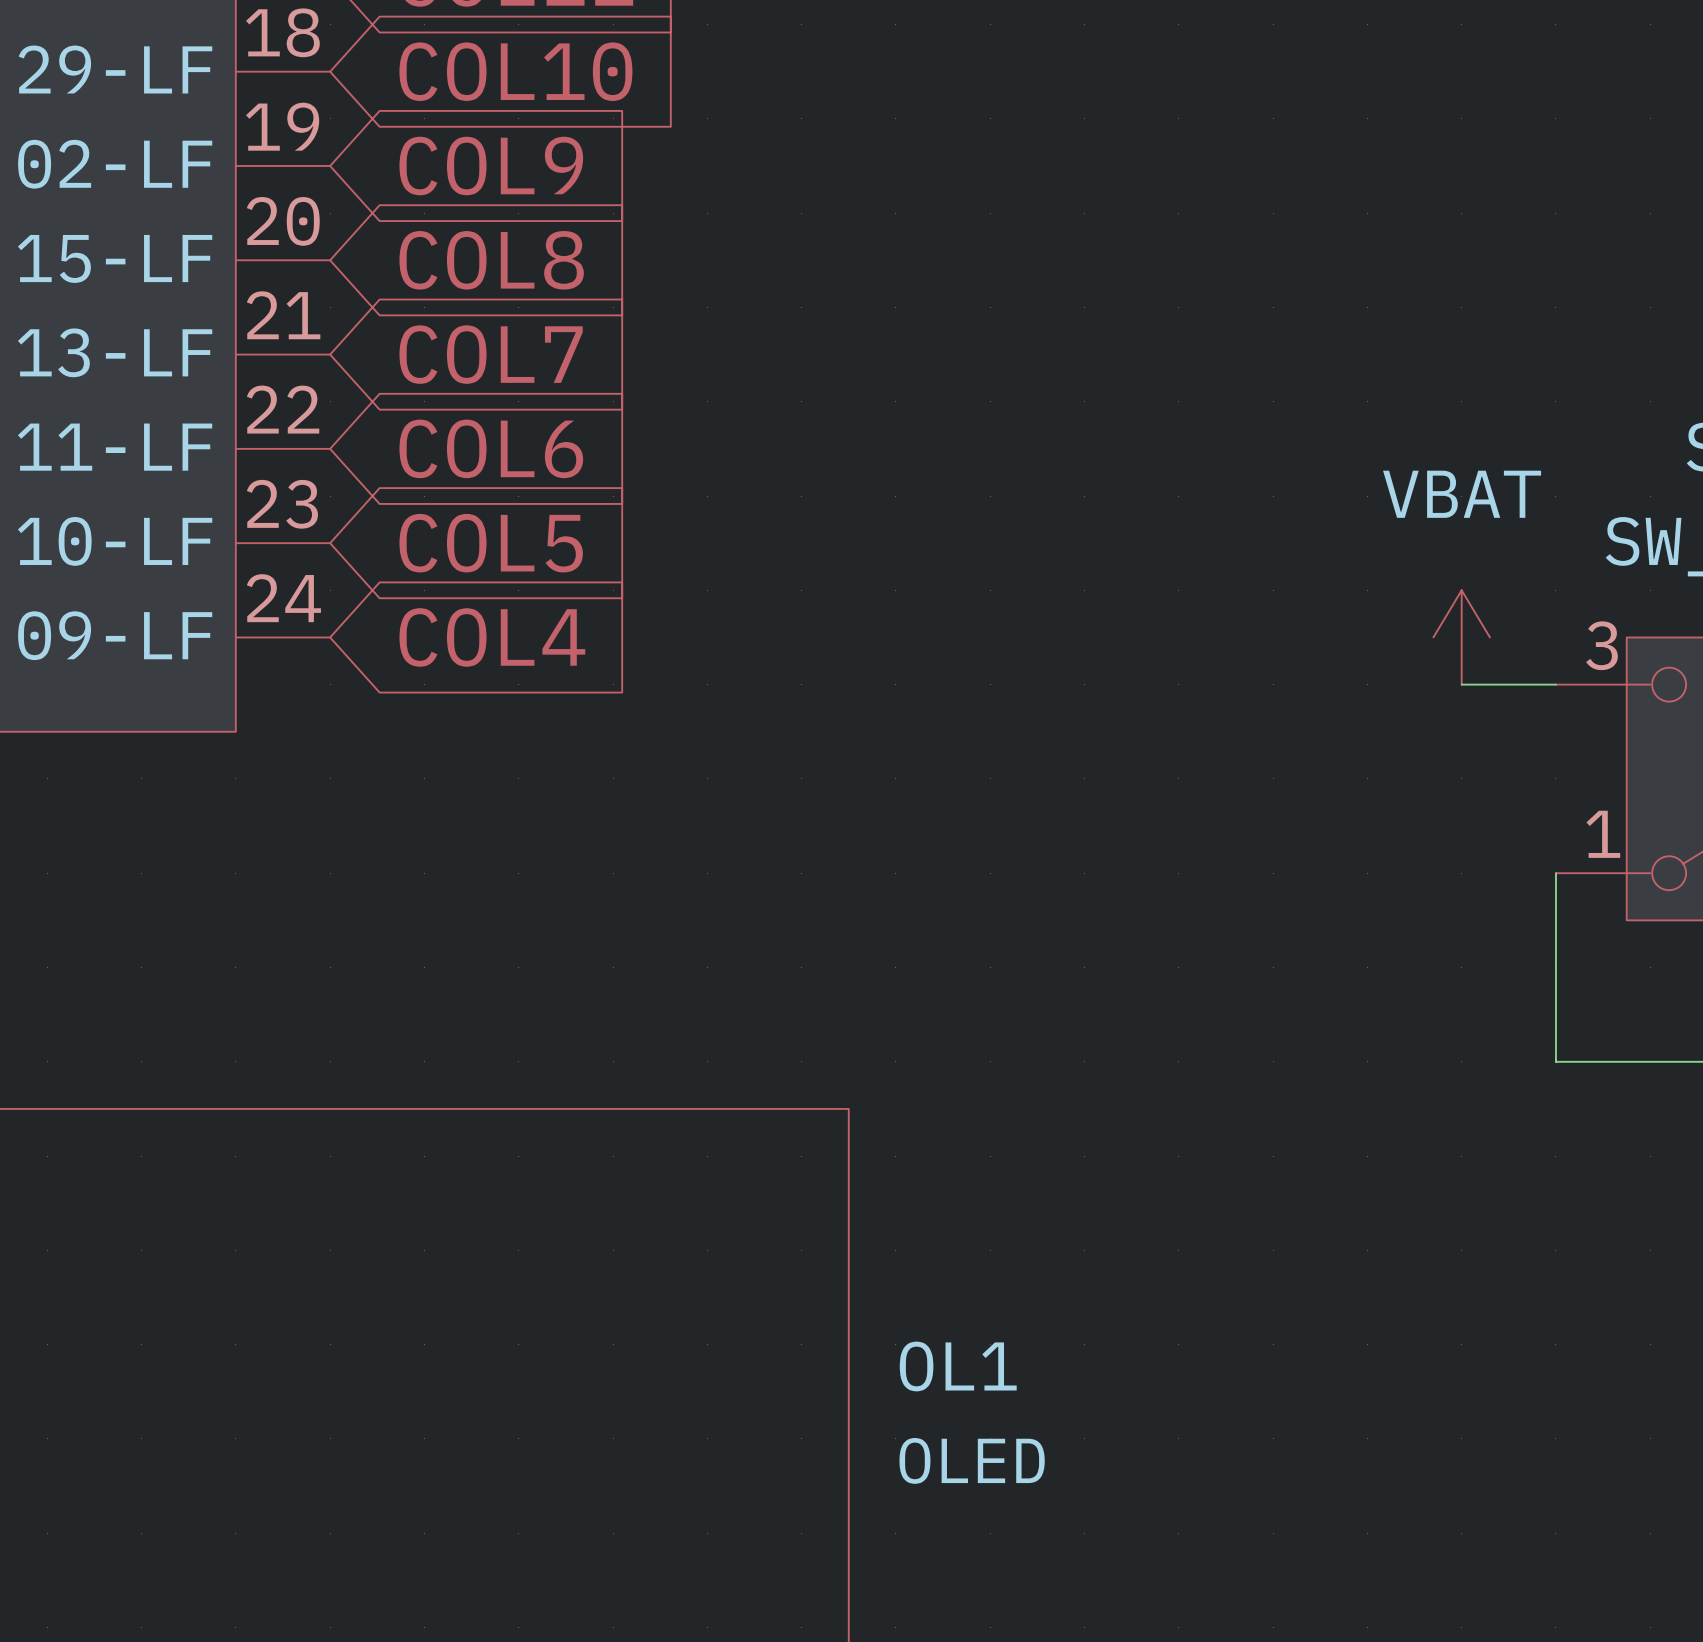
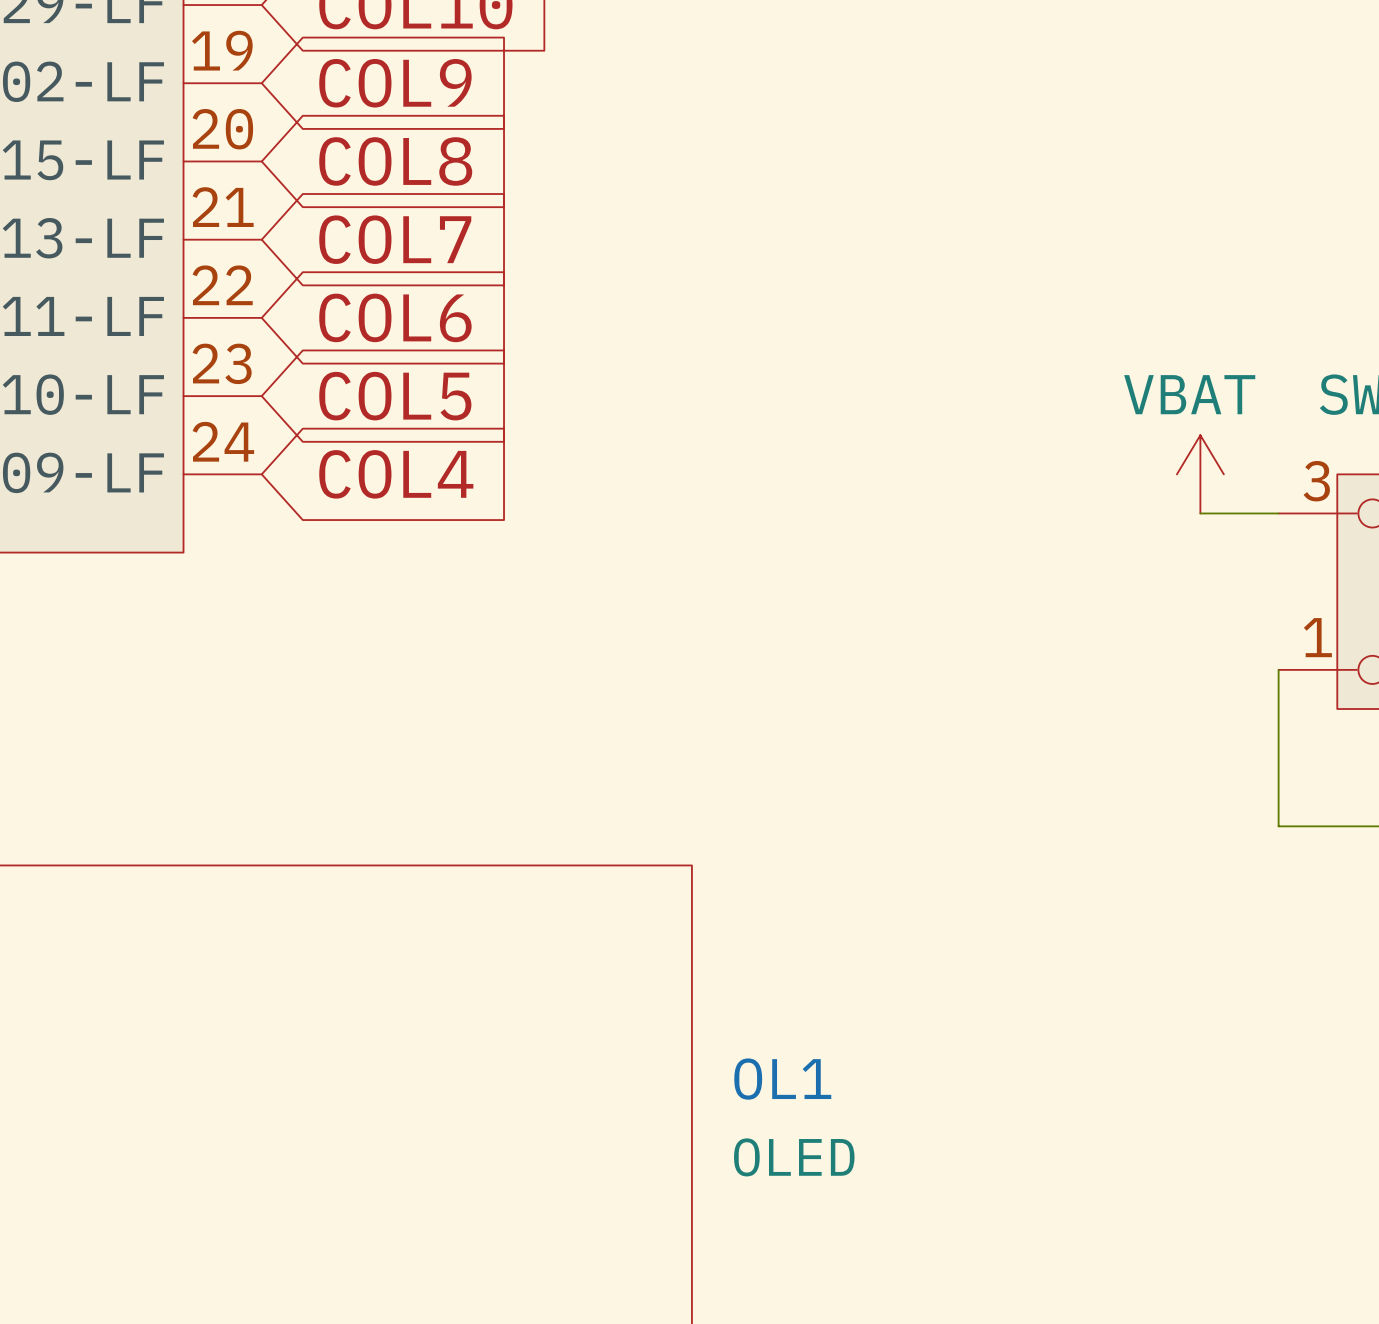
power symbol text position: VBAT (1462, 494) -> VBAT (1189, 394)

